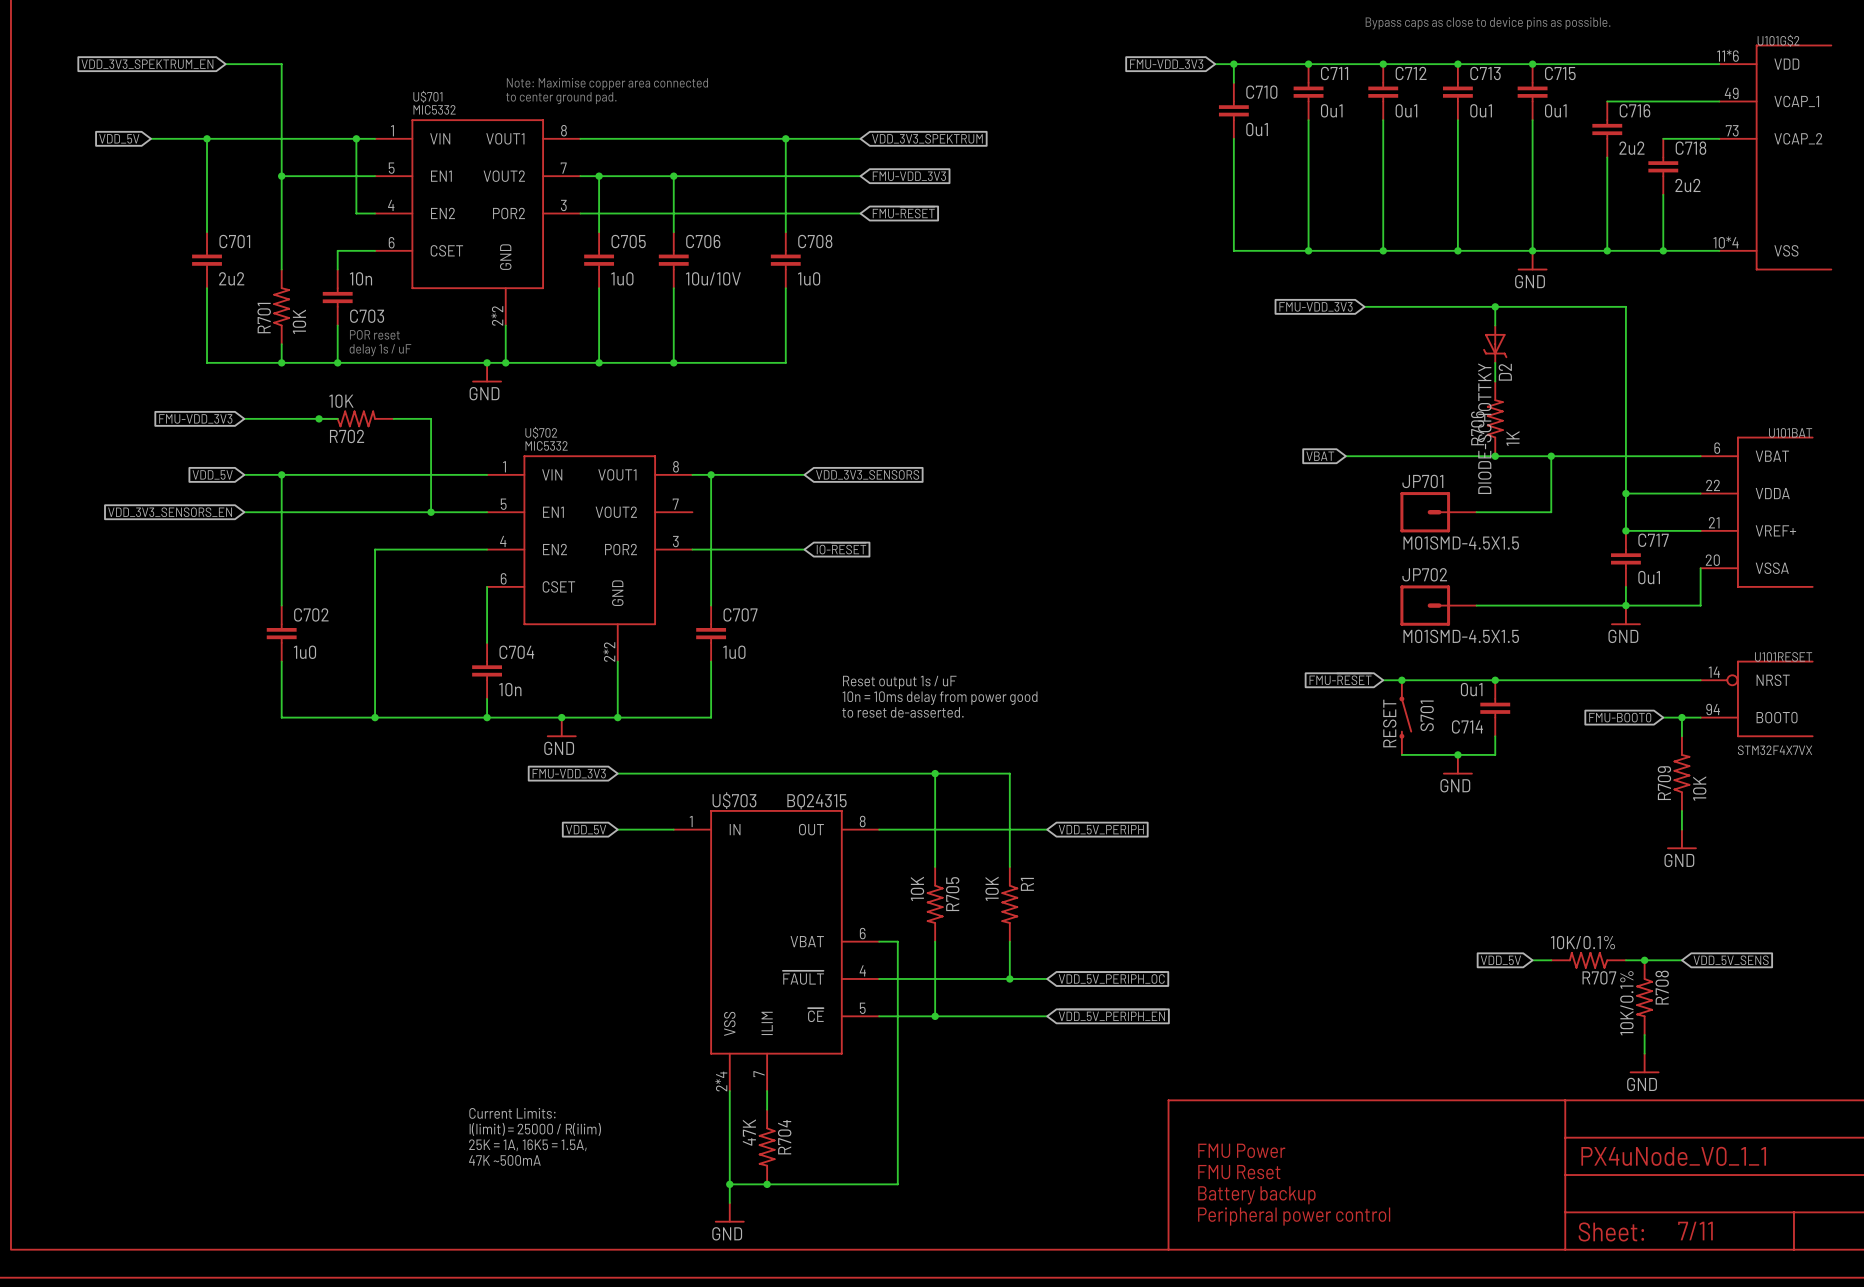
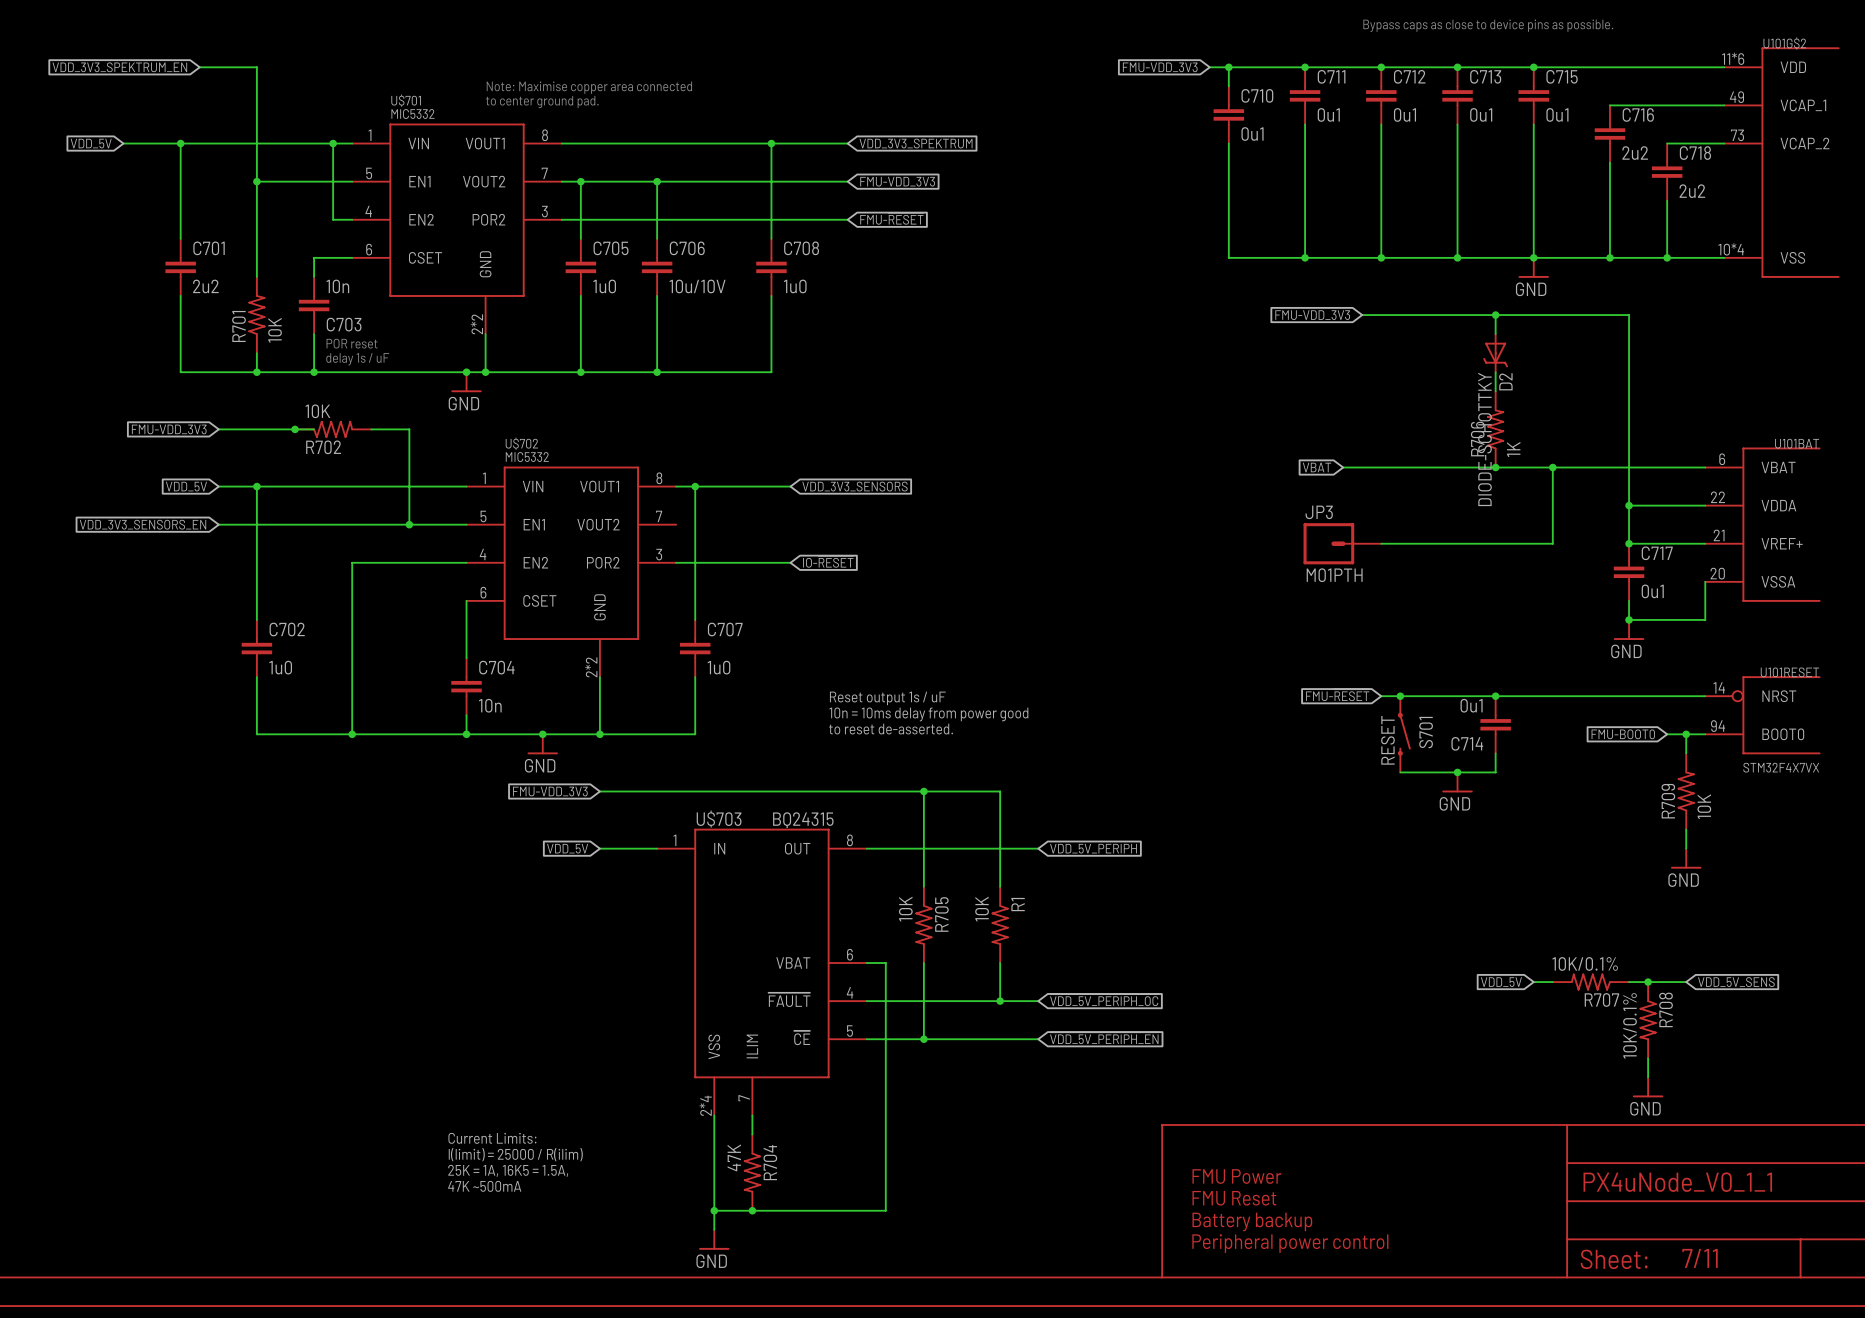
JP701: M01SMD-4.5X1.5 (1438, 512) -> none
wire: (1476, 512) (1551, 512) -> (1381, 543) (1552, 543) (1552, 524)
JP3: none -> M01PTH (1342, 543)
JP702: M01SMD-4.5X1.5 (1438, 605) -> none
wire: (1476, 605) (1625, 605) -> none

